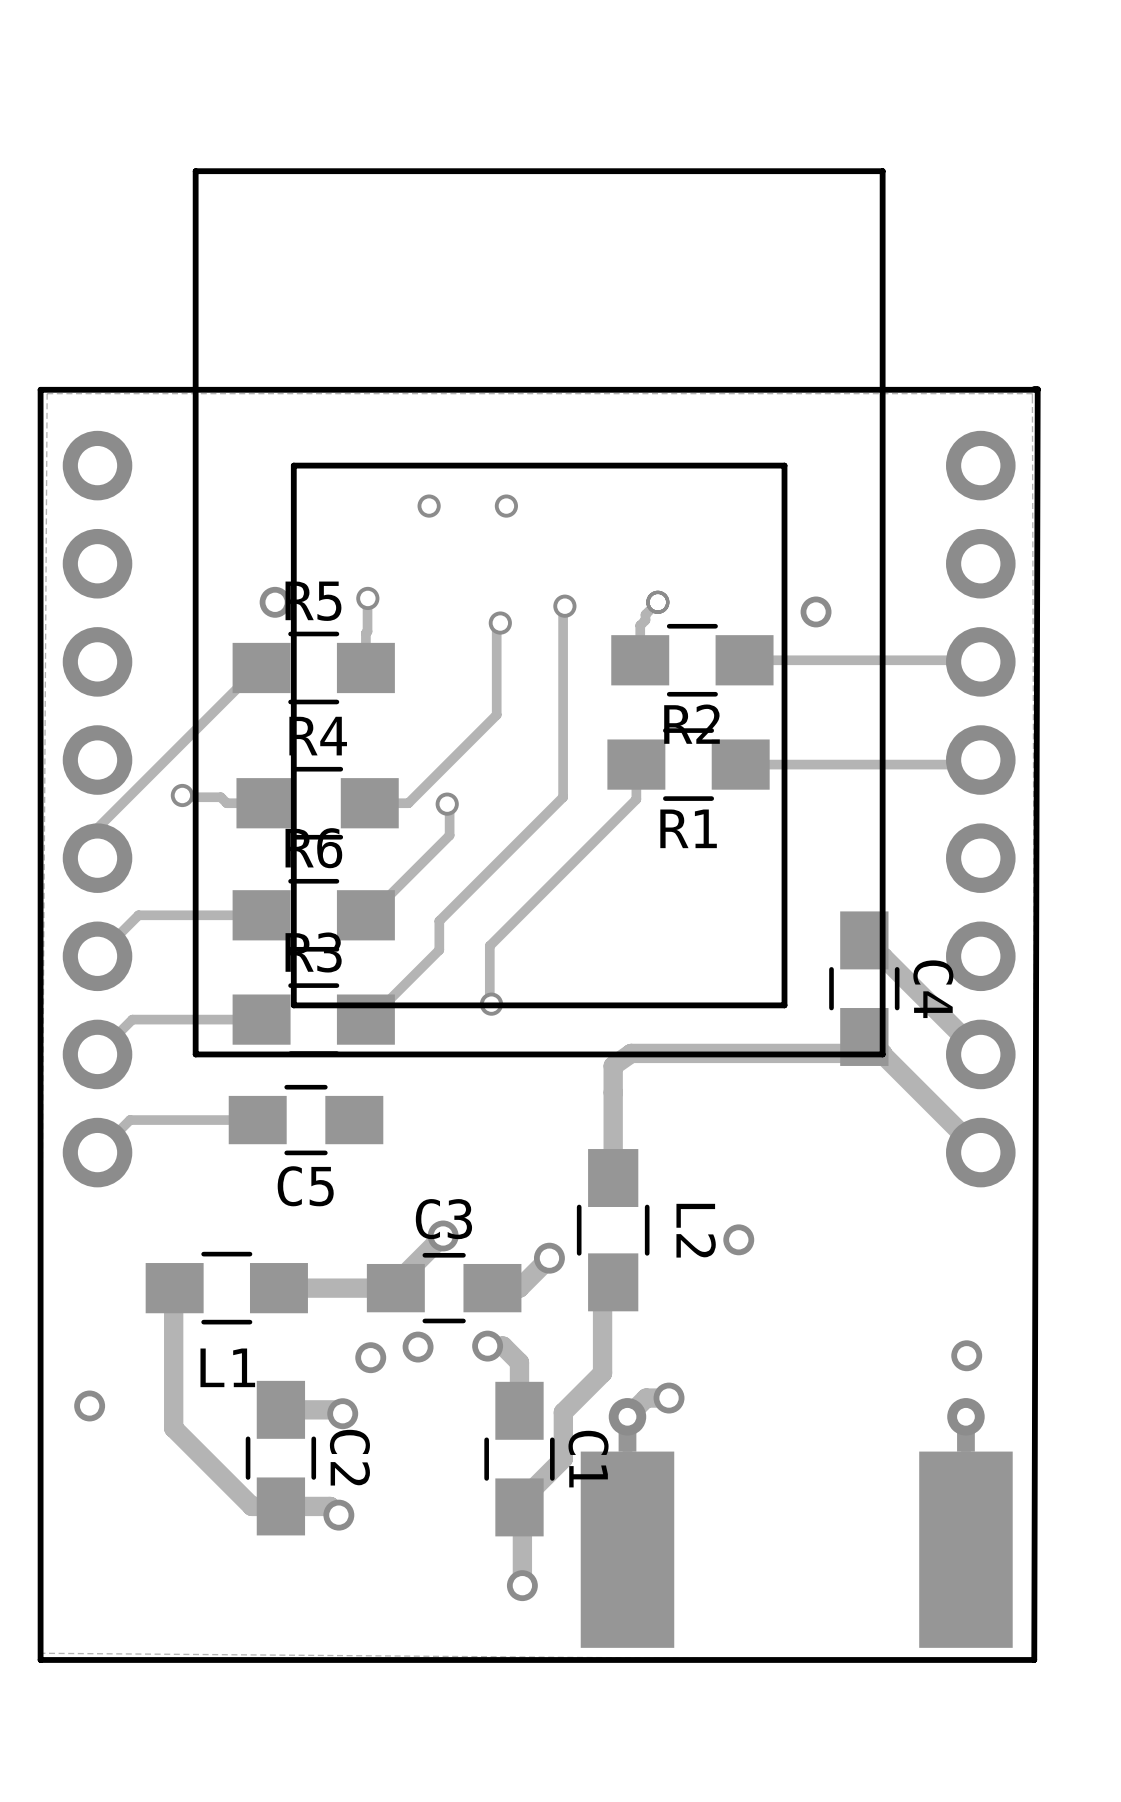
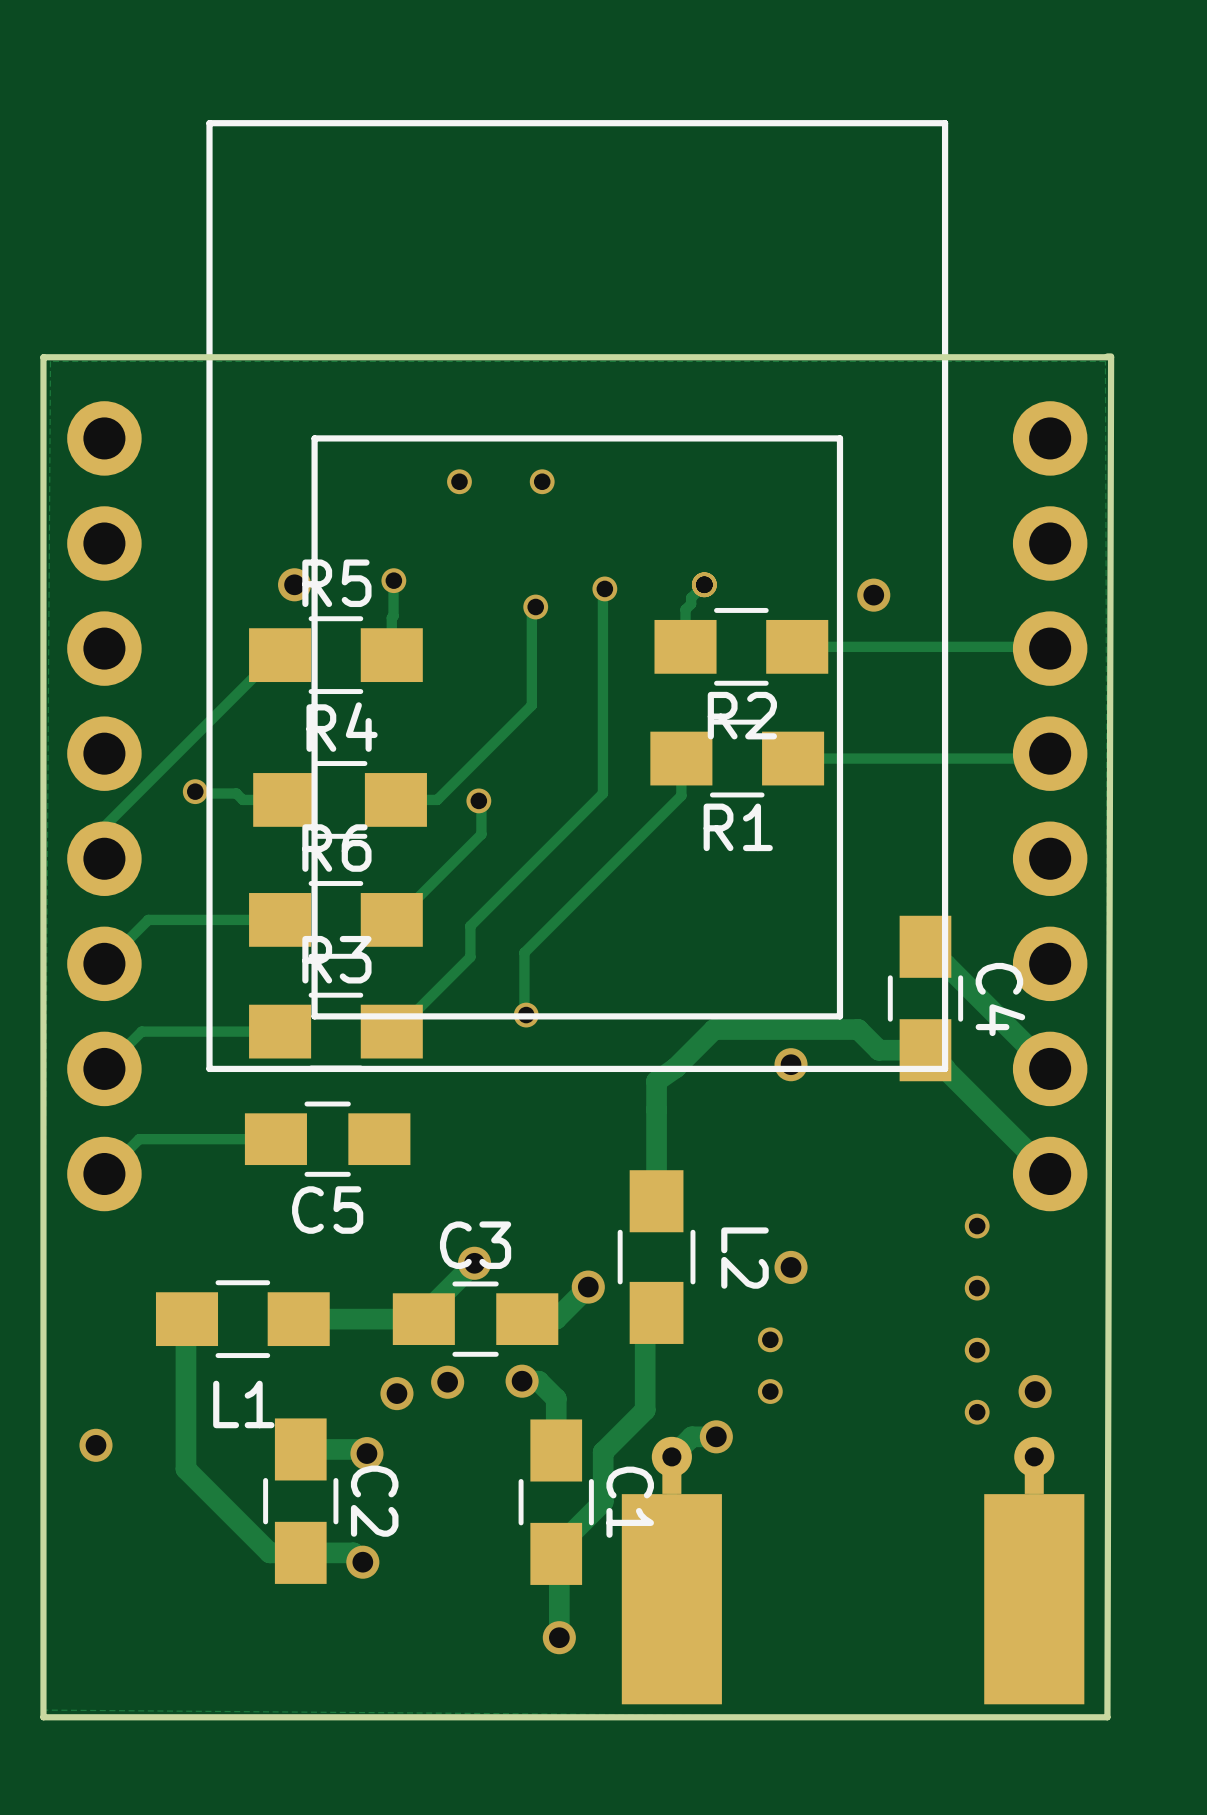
via: none -> (791, 1064)
track: (882, 1053) (631, 1053) -> (925, 1050) (878, 1050) (858, 1029) (714, 1029) (675, 1067)
via: none -> (977, 1226)
via: none -> (977, 1288)
via: none -> (770, 1339)
via: none -> (977, 1350)
via: none -> (770, 1391)
via: none -> (977, 1412)

